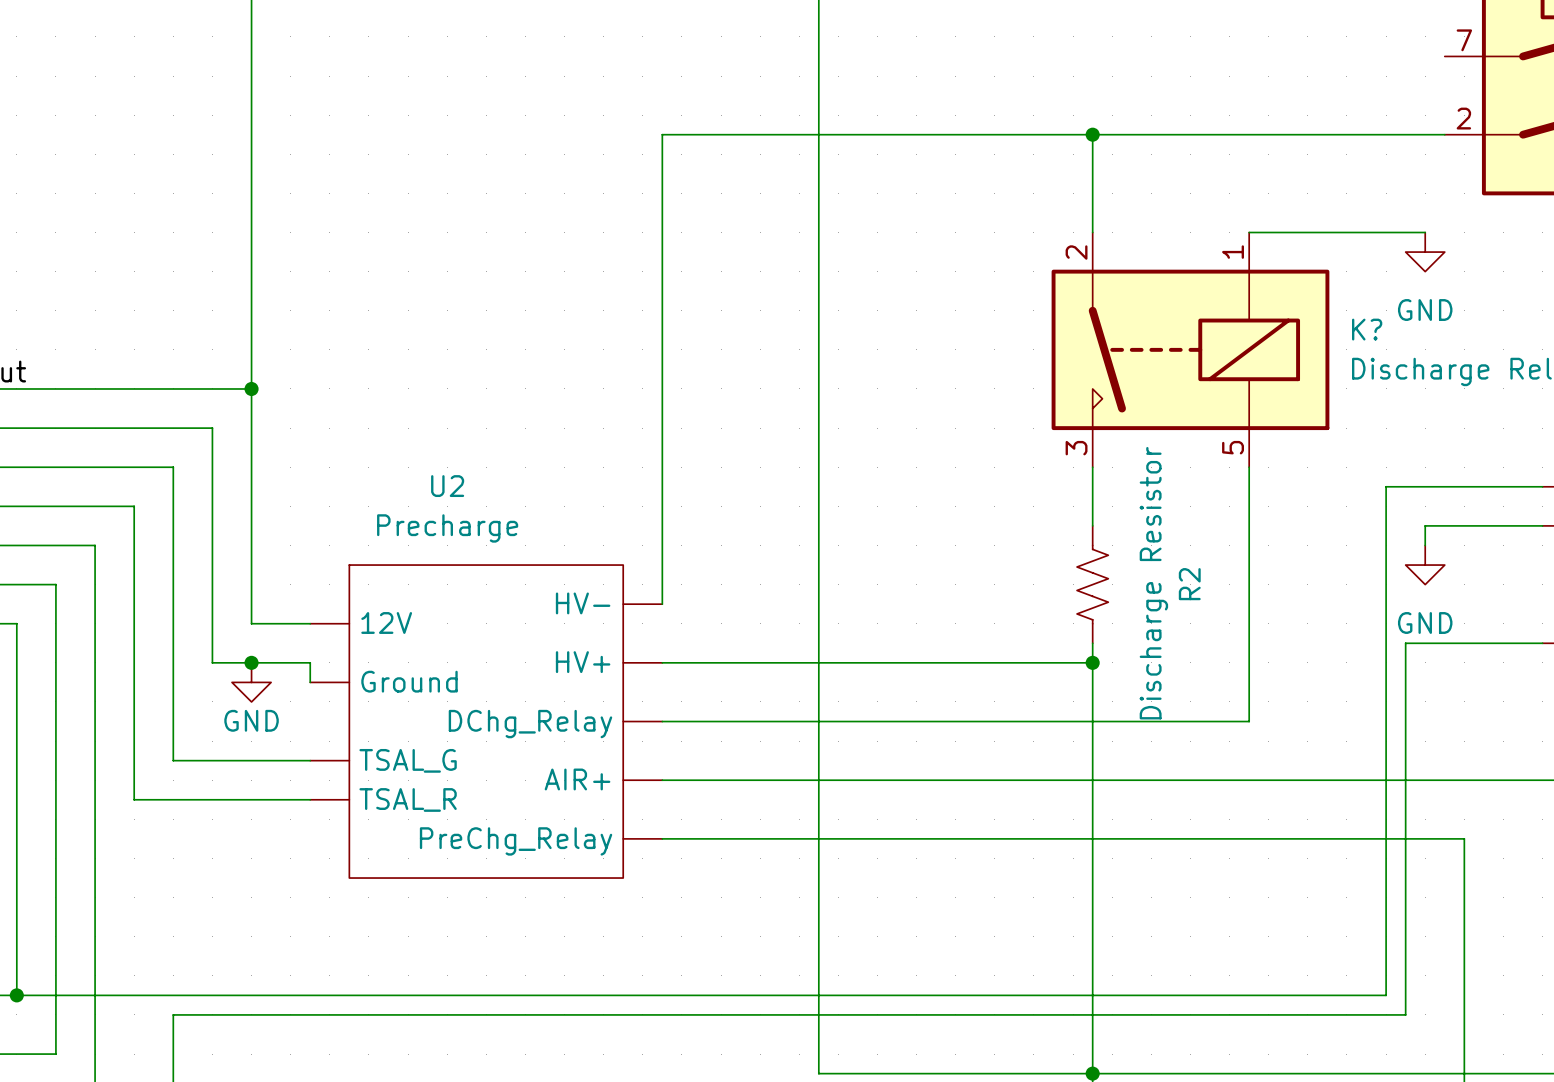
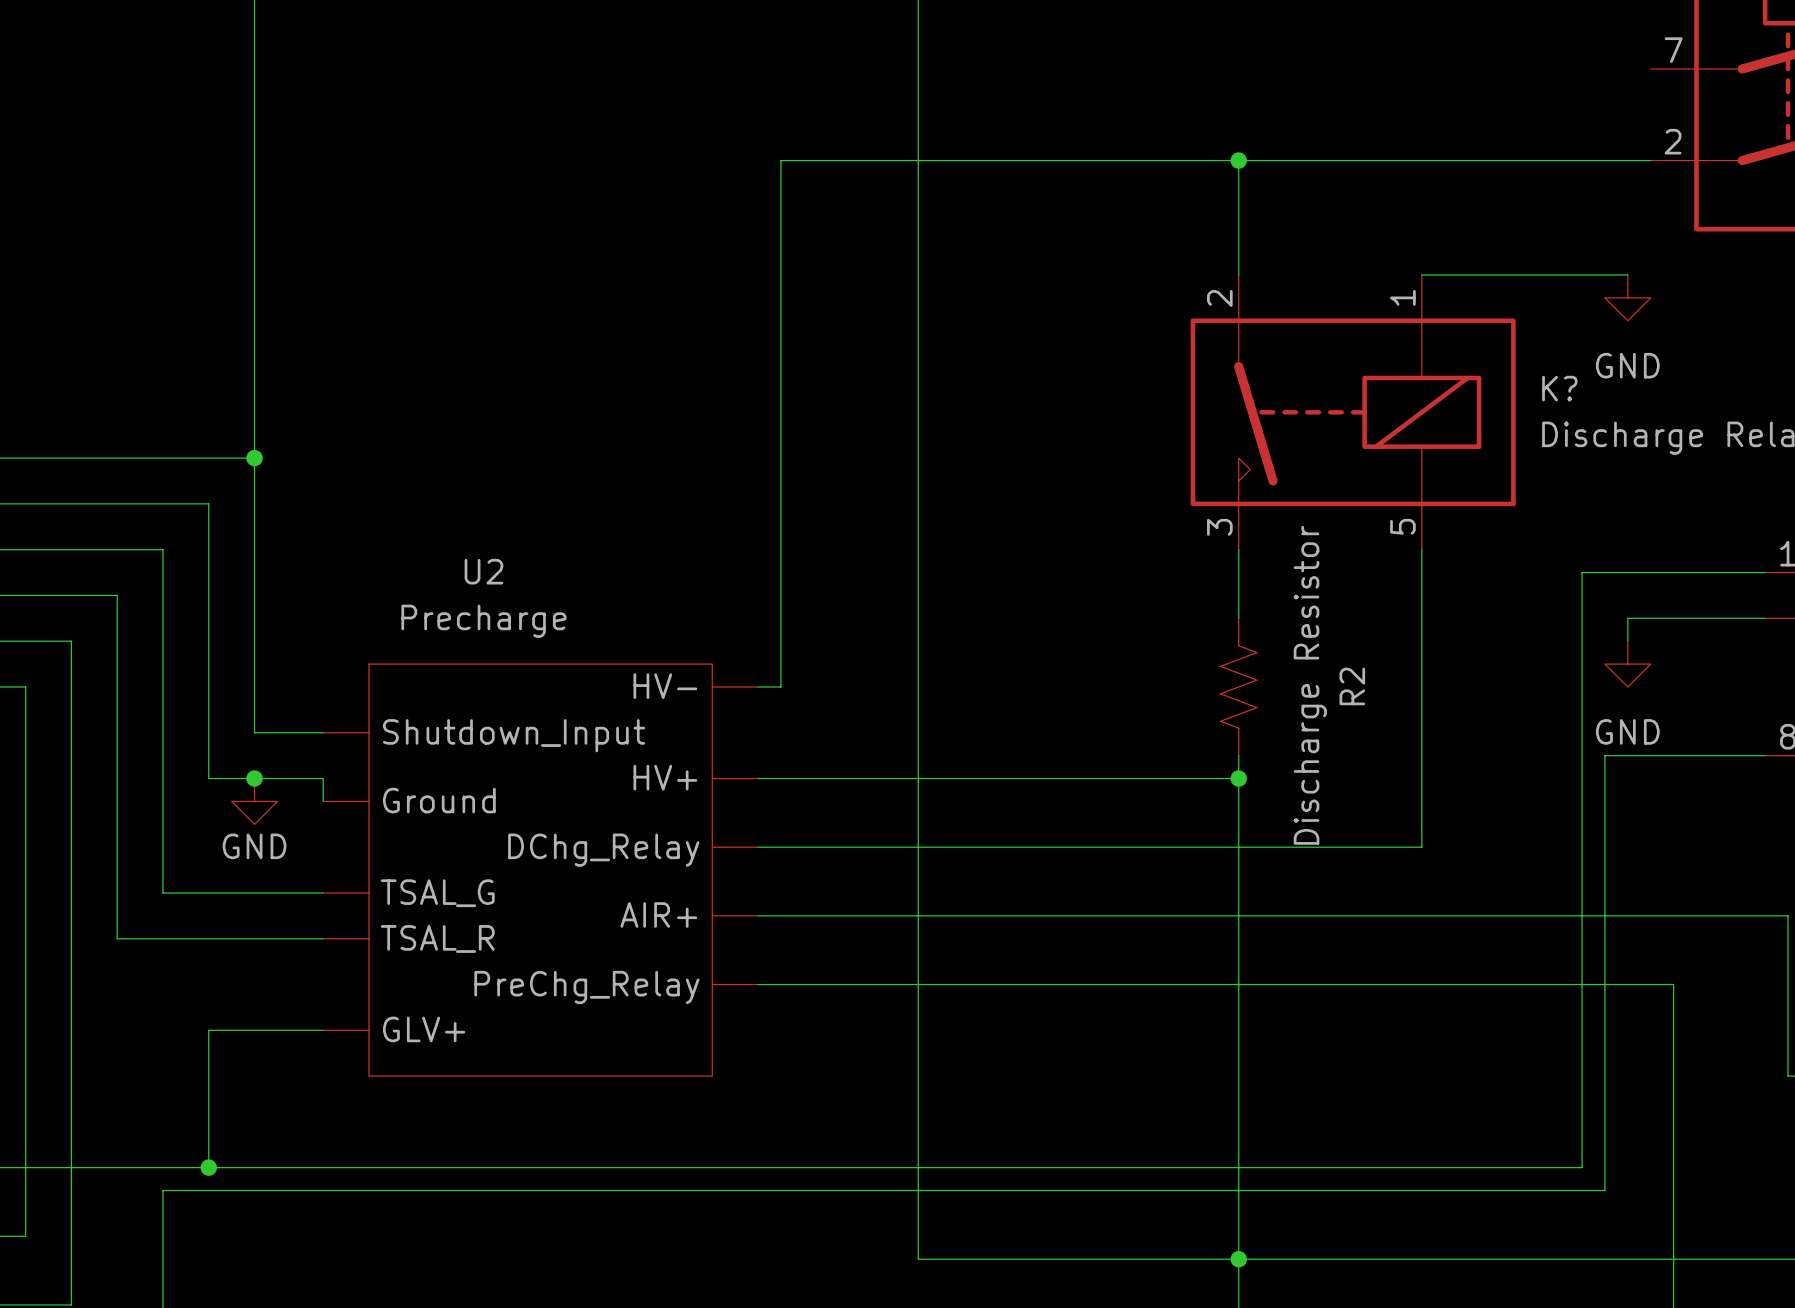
wire: (701, 134) (662, 134) (662, 604) -> (780, 160) (780, 686) (758, 686)
U2 symbol: [310, 565, 663, 879] -> [323, 664, 759, 1077]
wire: none -> (323, 1030) (208, 1030) (208, 1167)
junction: none -> (208, 1167)

